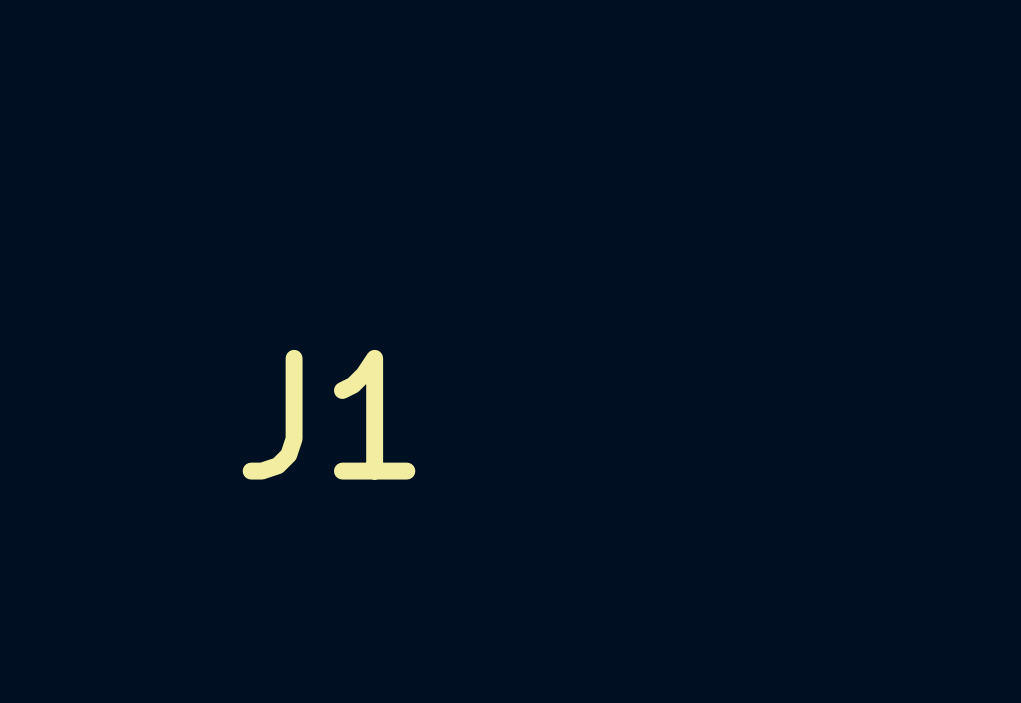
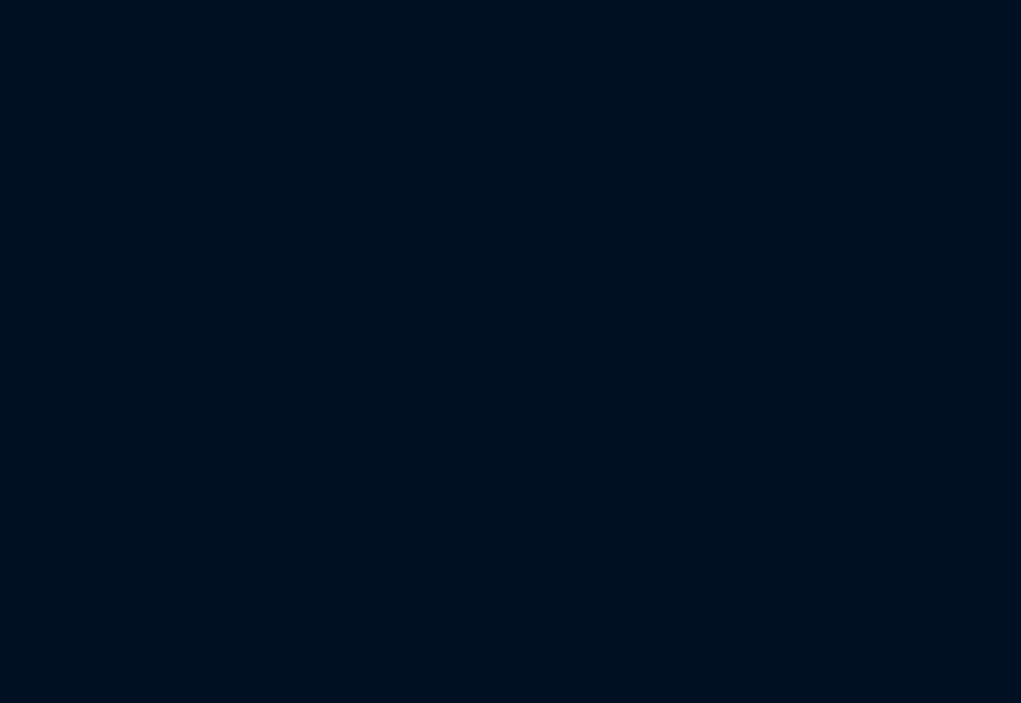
J1 name: J1 (328, 414) -> none

